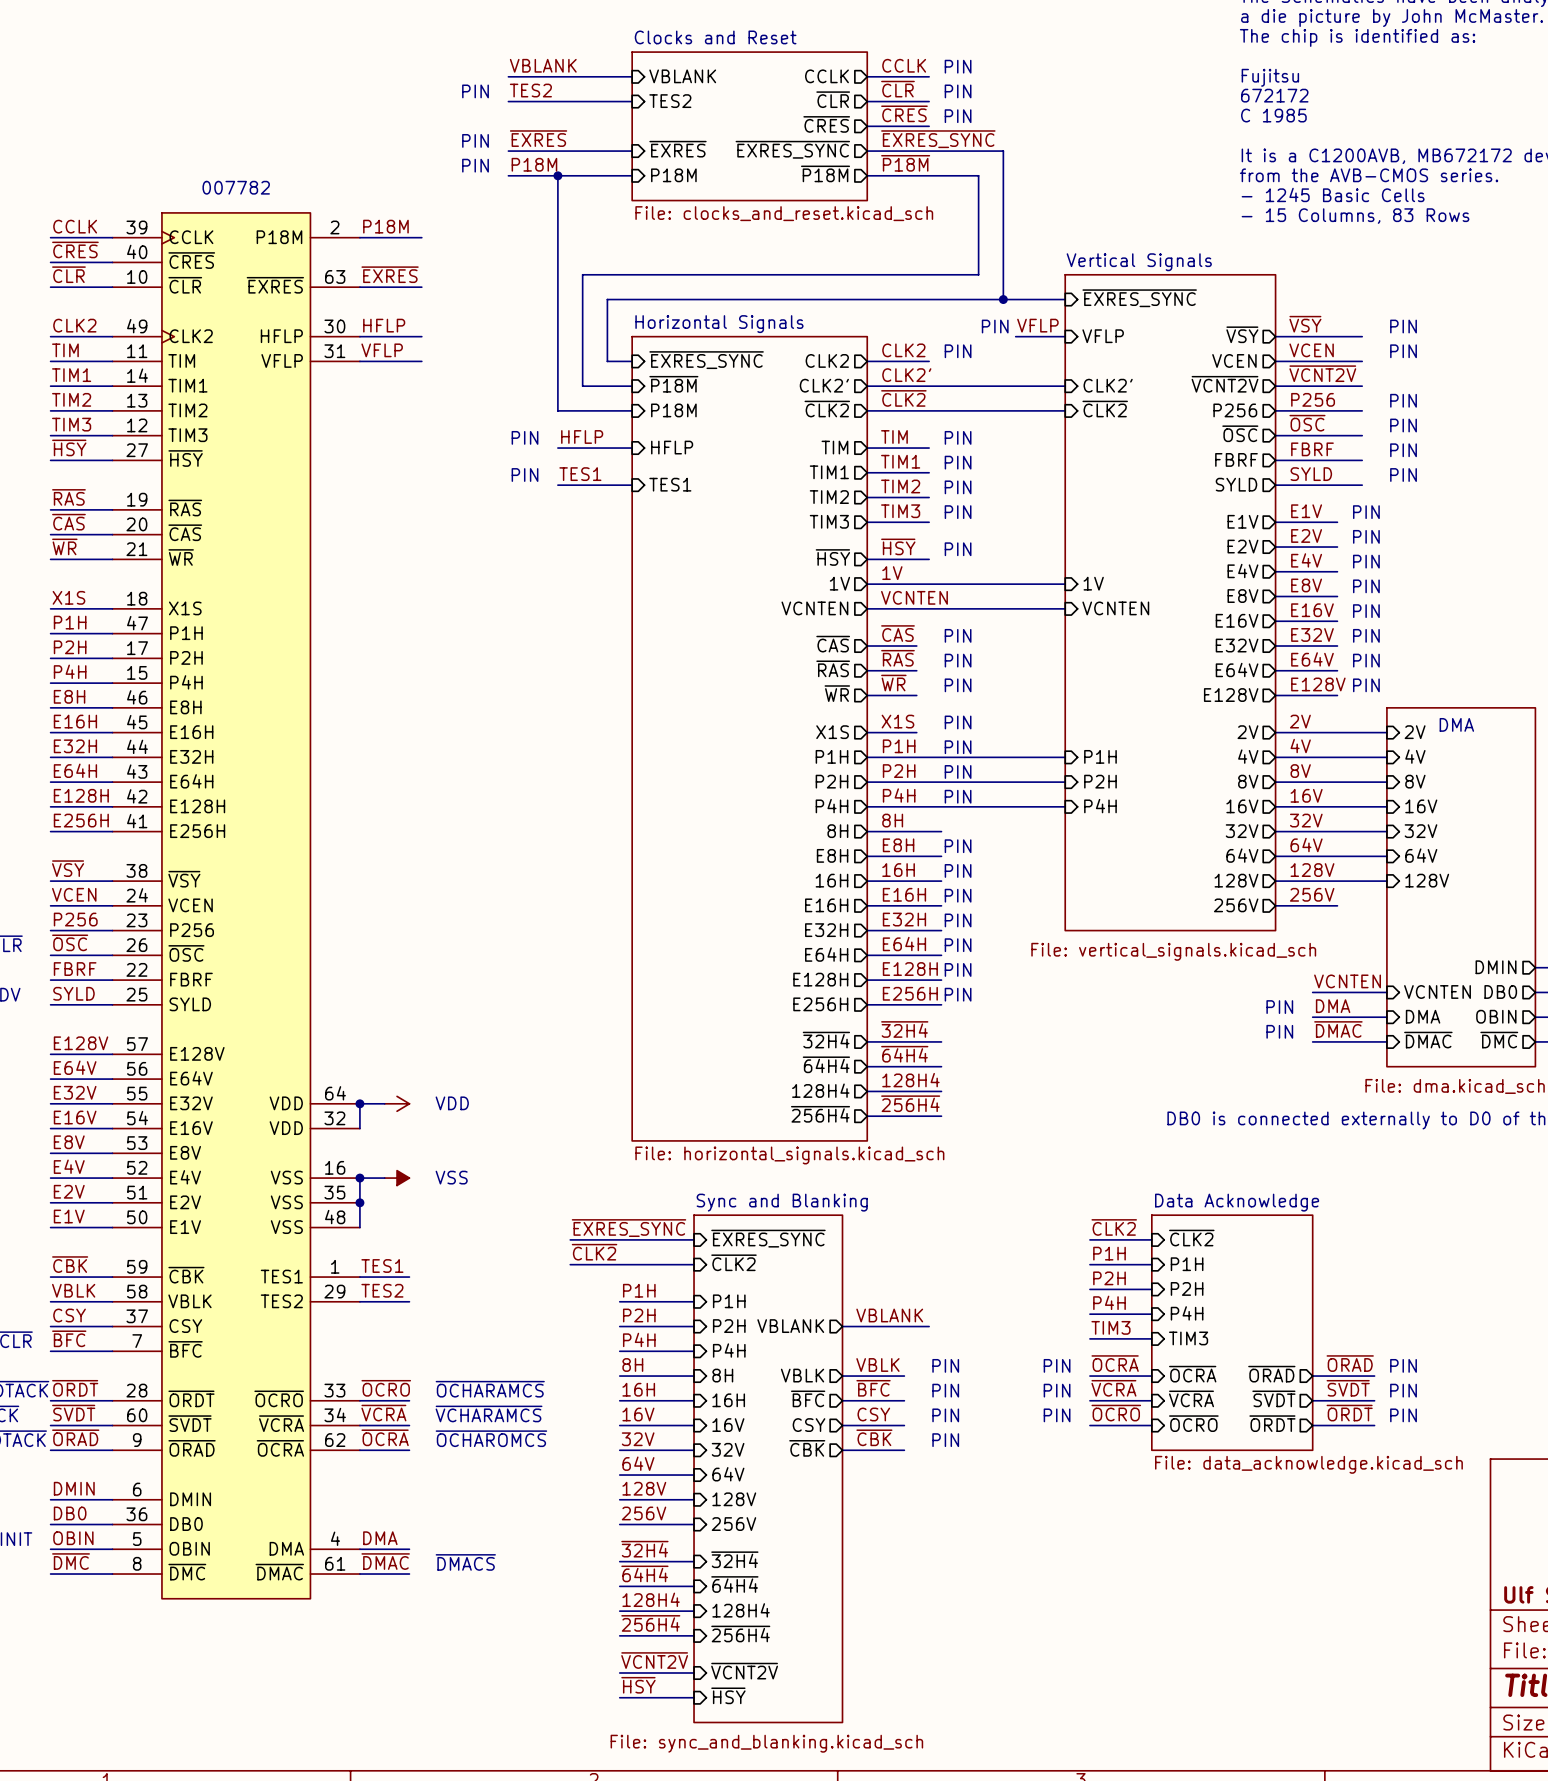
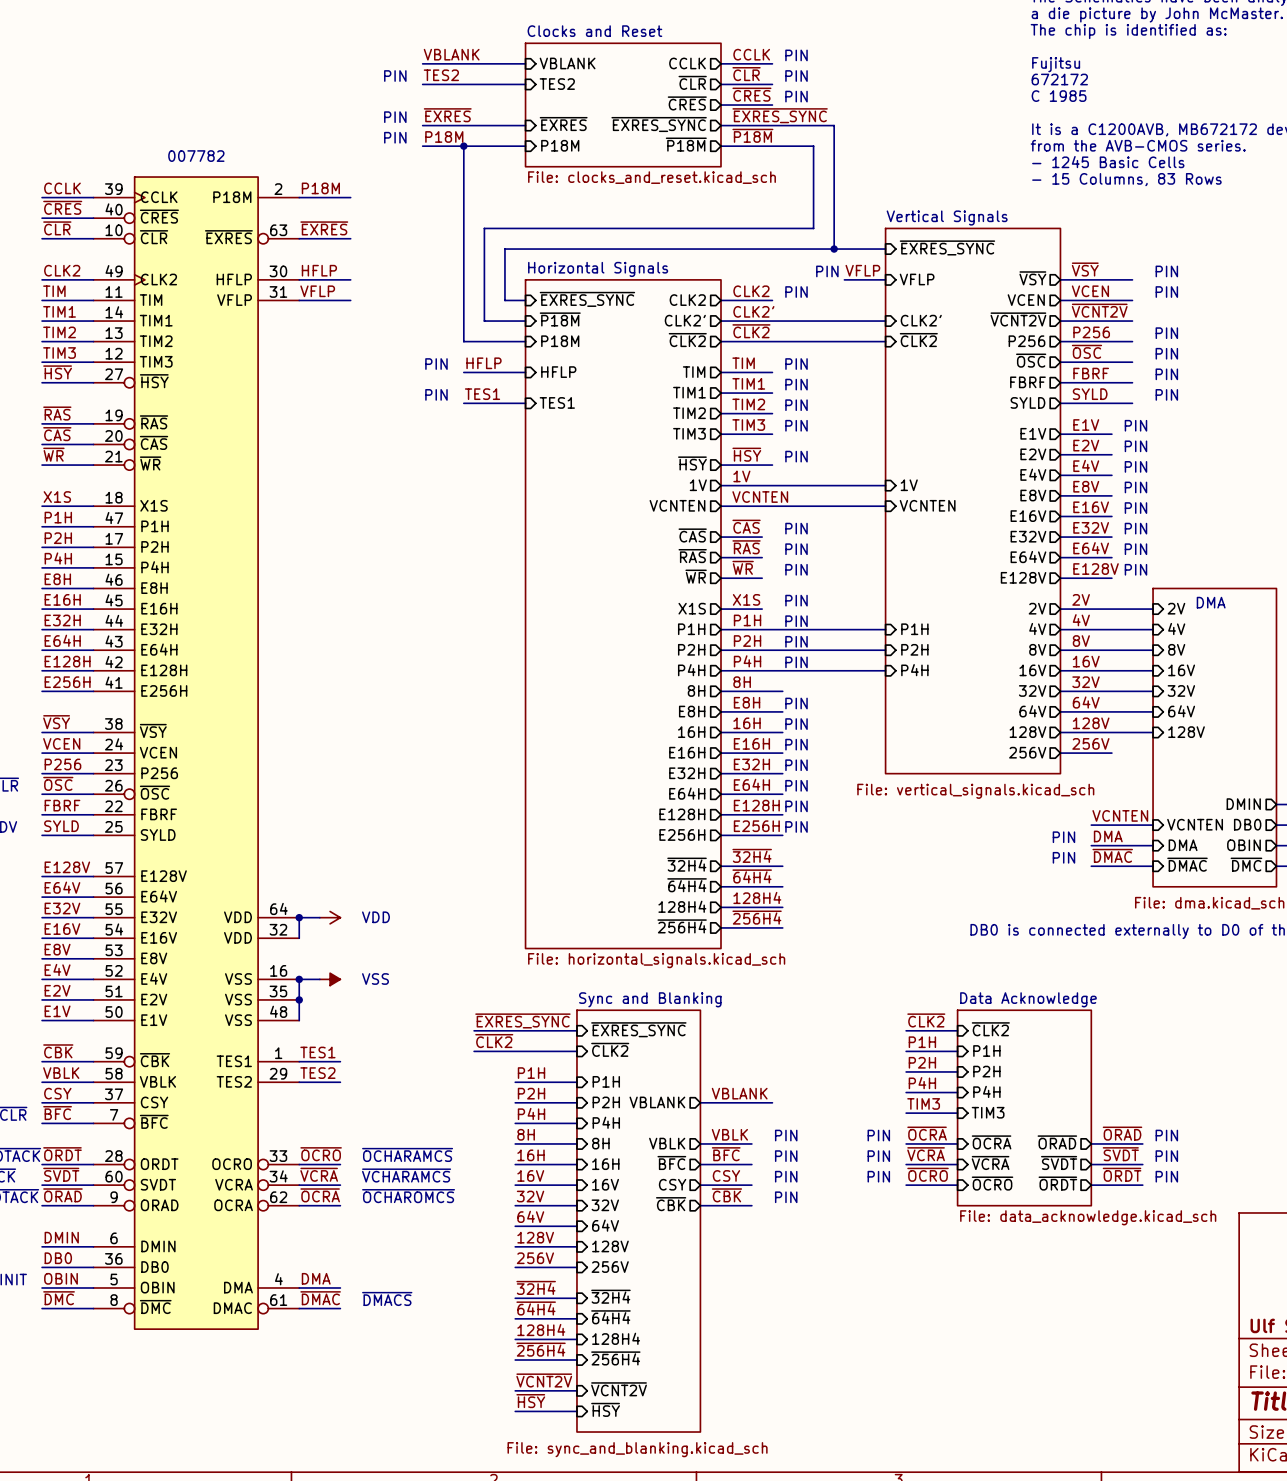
part symbol: [112, 212, 360, 1599] -> [93, 177, 300, 1330]

